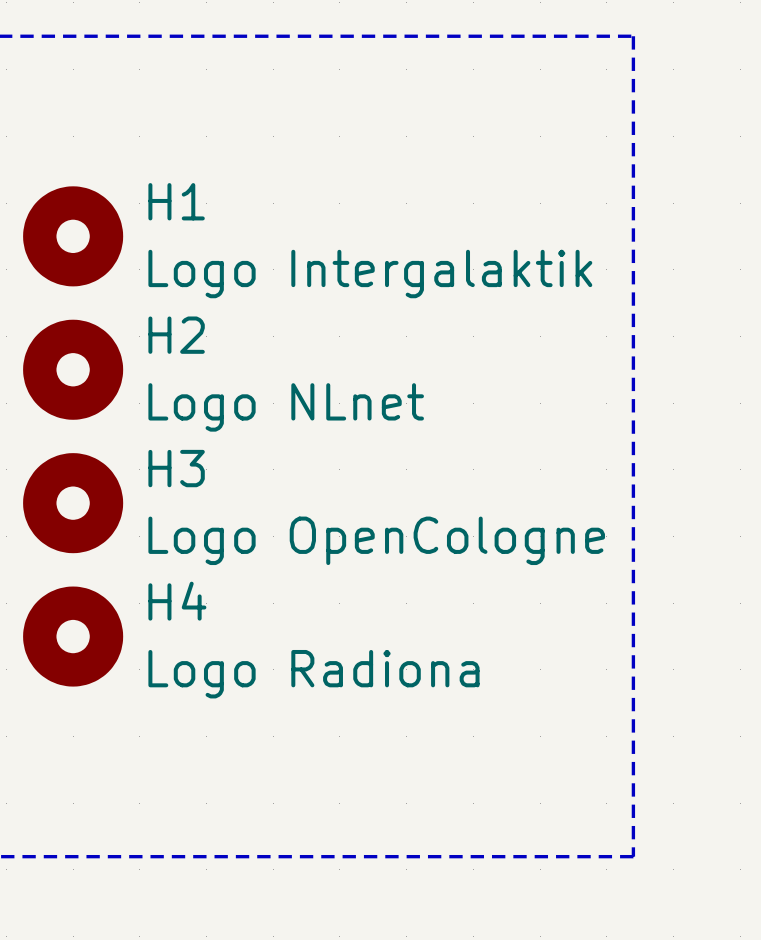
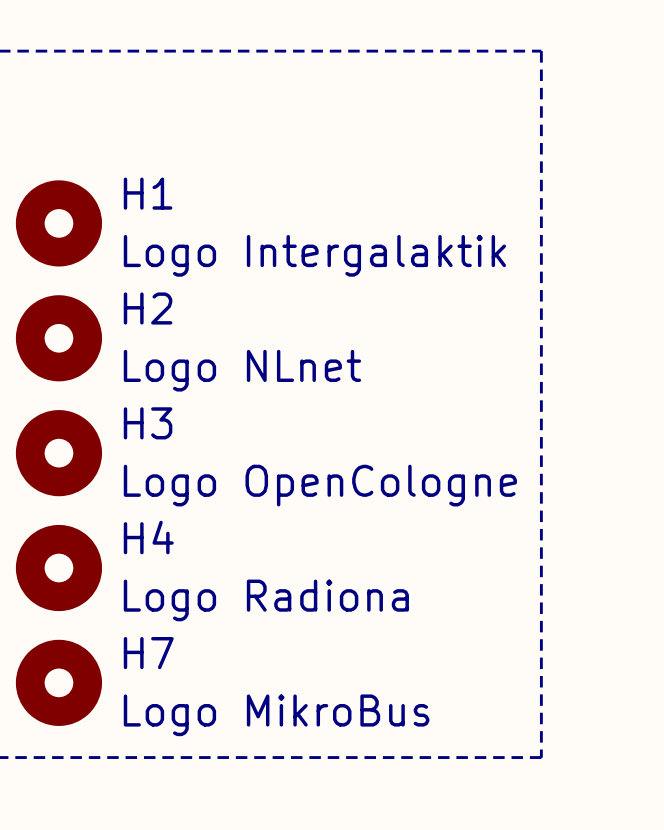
H7: none -> Logo MikroBus (58, 682)

